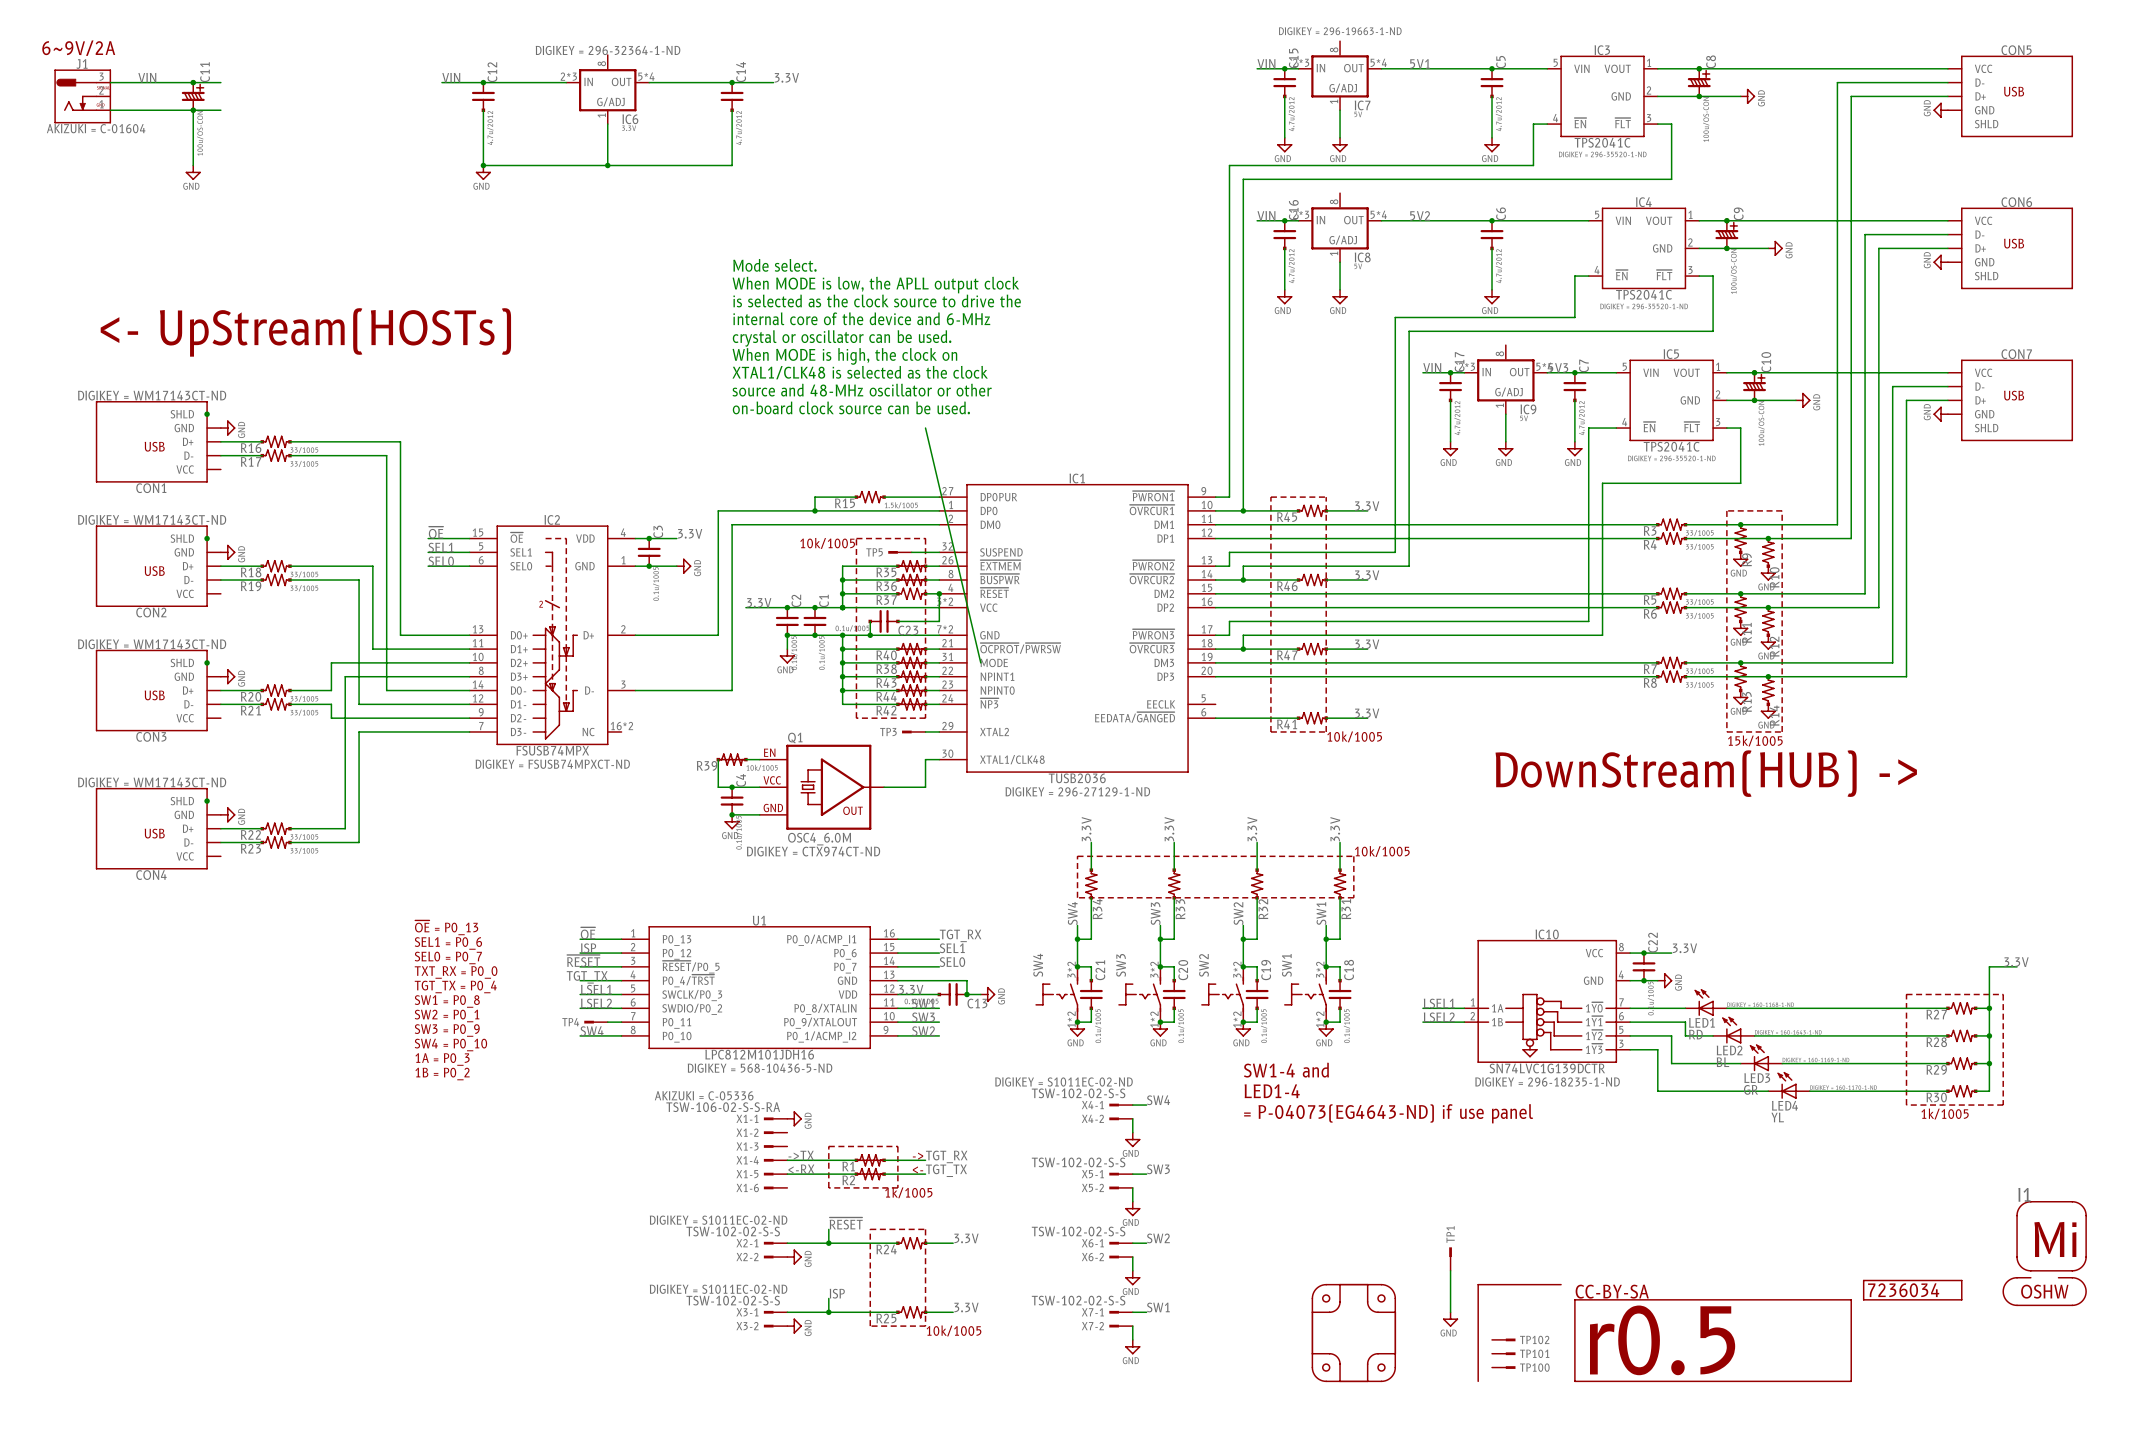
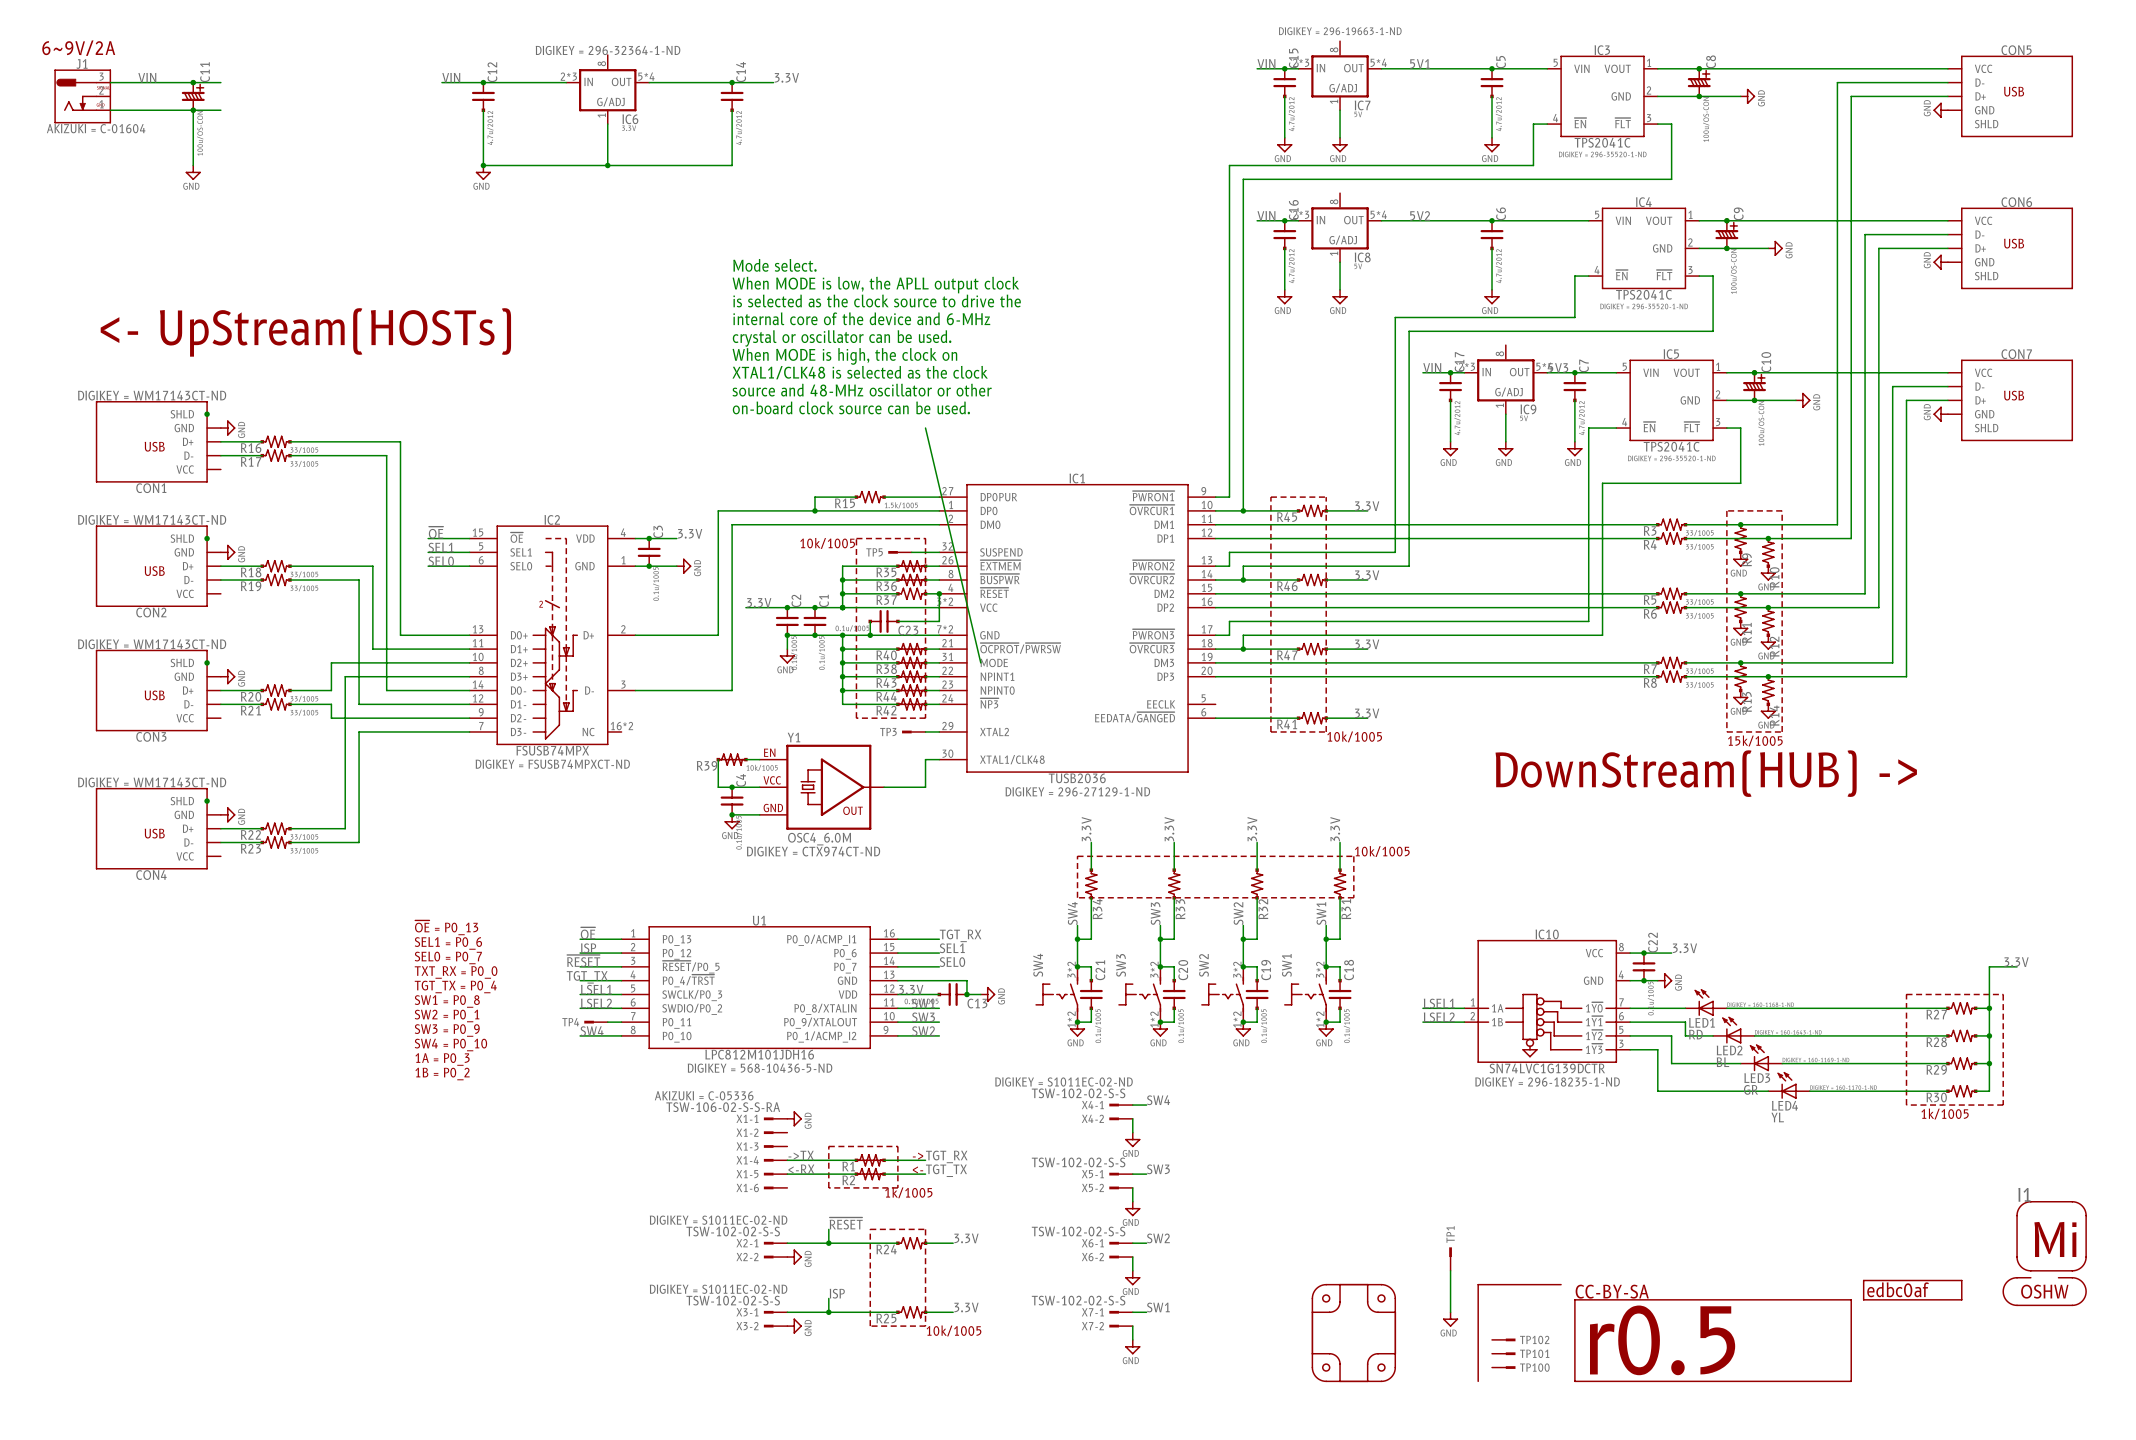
Q1 name: Q1 (795, 737) -> Y1 (793, 737)
text: SW1-4 and (1286, 1070) -> none
text: LED1-4 (1272, 1091) -> none
text: = P-04073(EG4643-ND) if use panel (1388, 1113) -> none
part value: 7236034 (1903, 1290) -> edbc0af (1898, 1289)

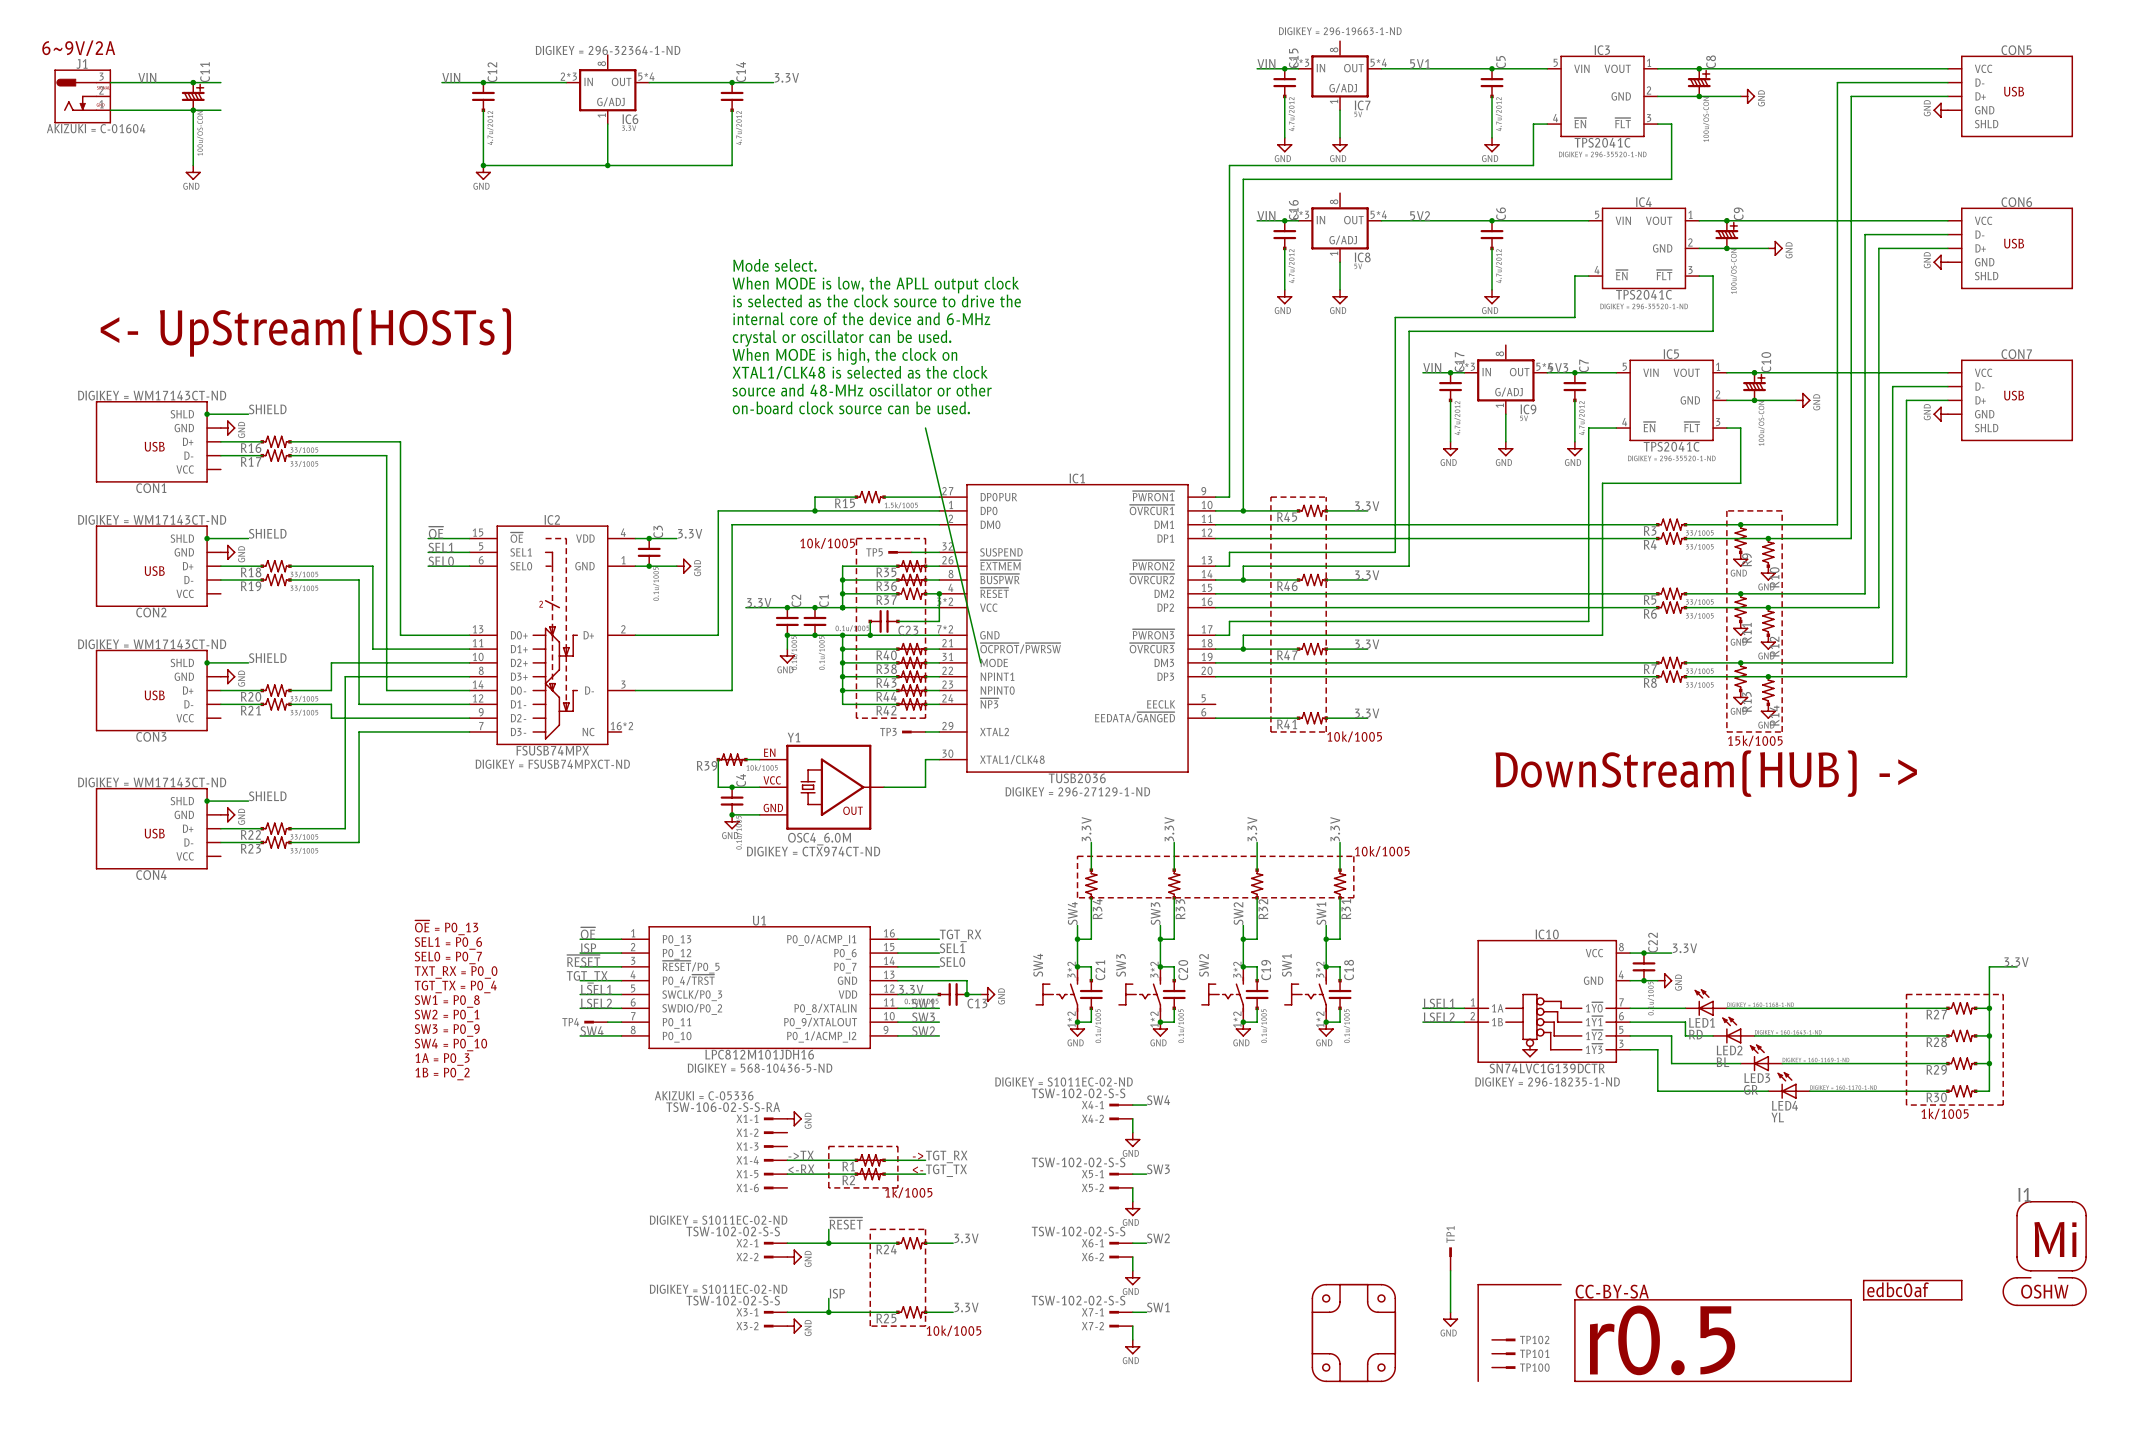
label: none -> SHIELD (267, 409)
wire: none -> (207, 414) (248, 414)
label: none -> SHIELD (267, 533)
wire: none -> (207, 538) (248, 538)
label: none -> SHIELD (267, 658)
wire: none -> (207, 662) (248, 662)
label: none -> SHIELD (267, 796)
wire: none -> (207, 801) (248, 801)

